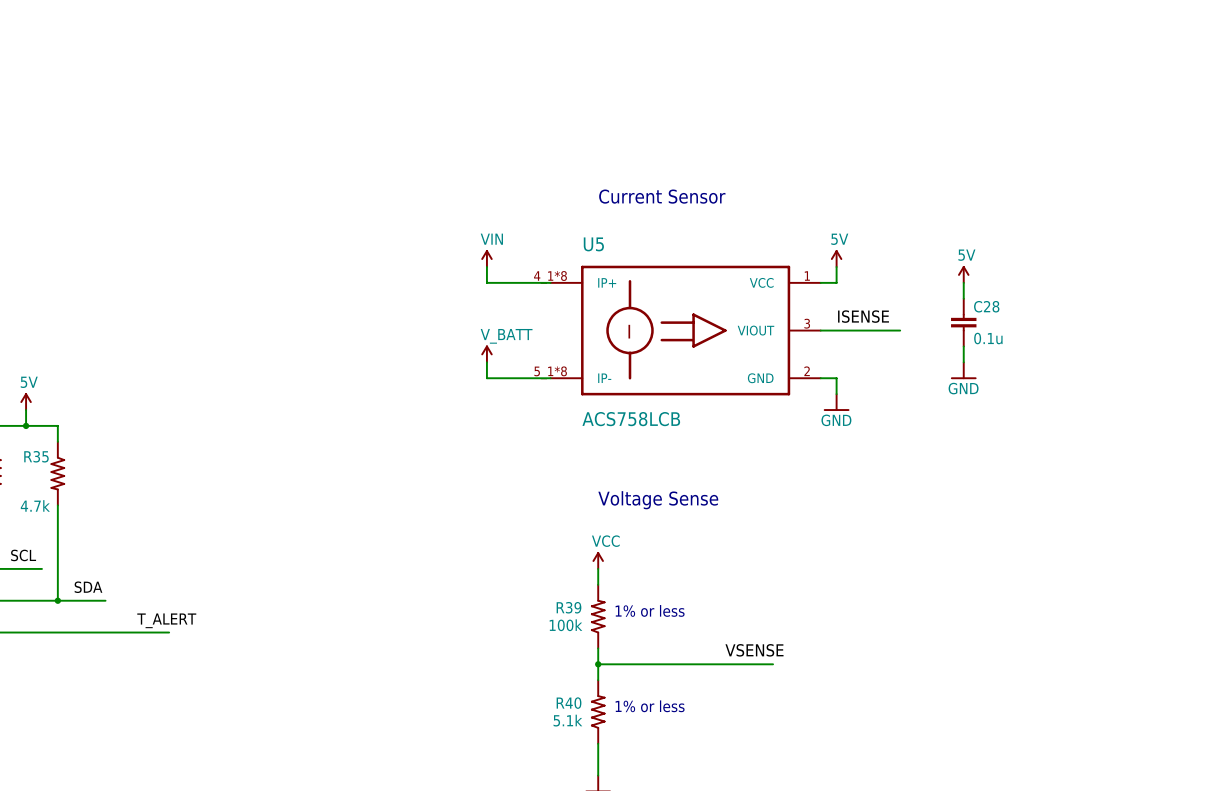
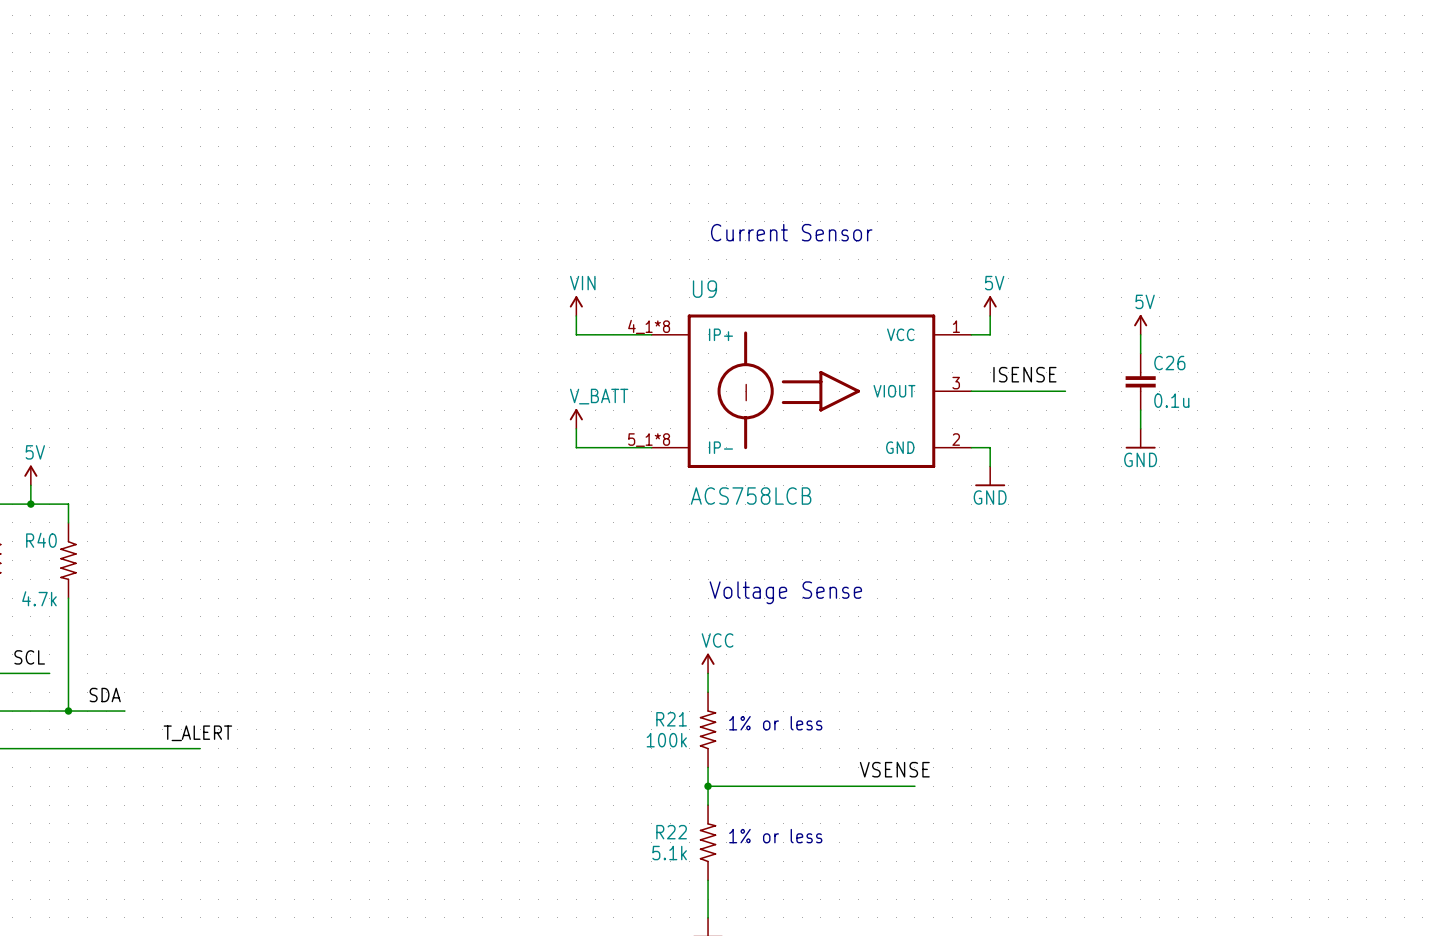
U5 name: U5 (593, 244) -> U9 (704, 289)
C28 name: C28 (986, 306) -> C26 (1169, 363)
R35 name: R35 (36, 456) -> R40 (41, 540)
R39 name: R39 (569, 607) -> R21 (671, 719)
R40 name: R40 (569, 703) -> R22 (671, 832)

